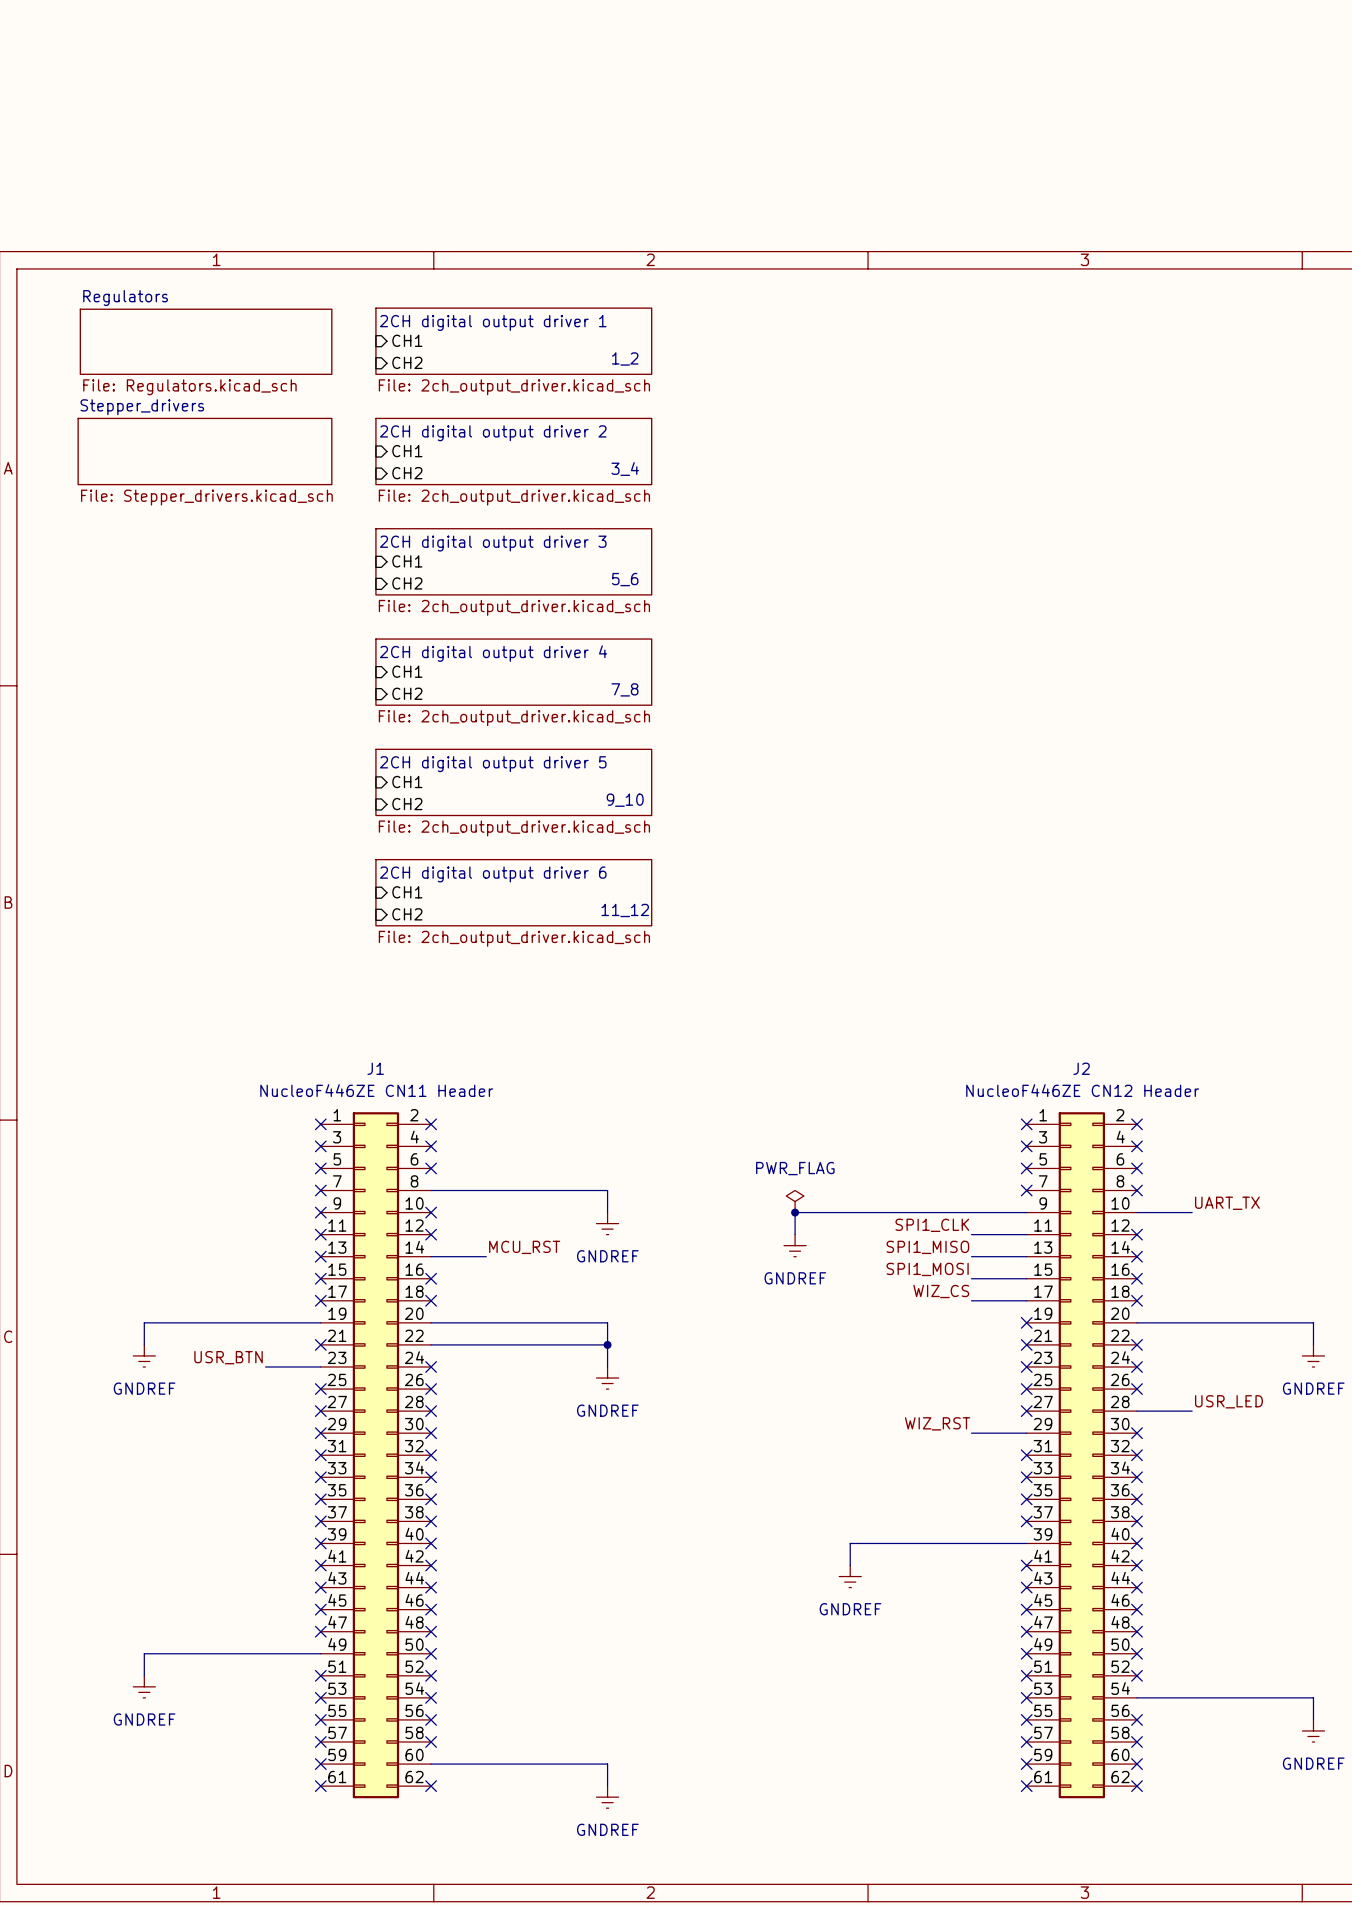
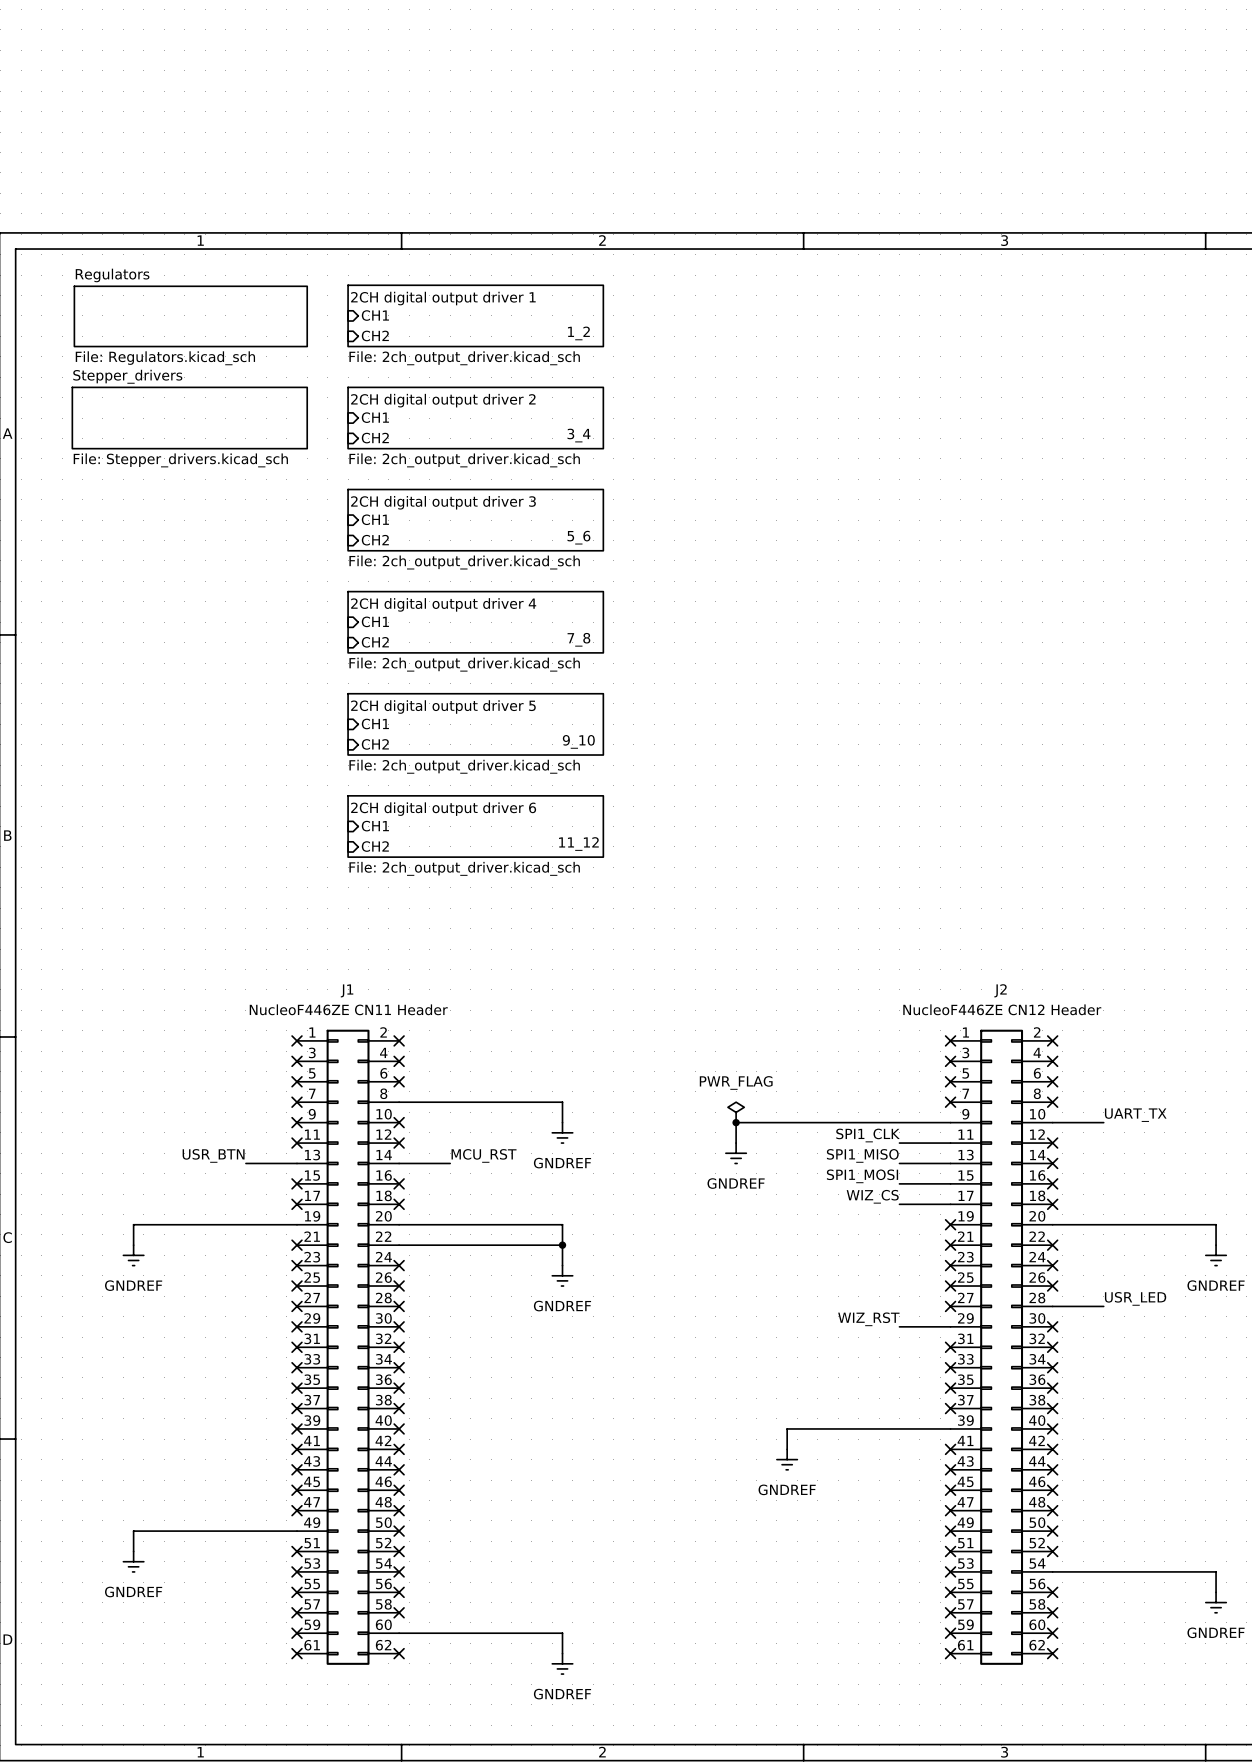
no-connect mark: (320, 1256) -> none
label position: USR_BTN (228, 1357) -> USR_BTN (213, 1155)
wire: (265, 1366) (320, 1366) -> (245, 1163) (297, 1163)
no-connect mark: none -> (297, 1265)

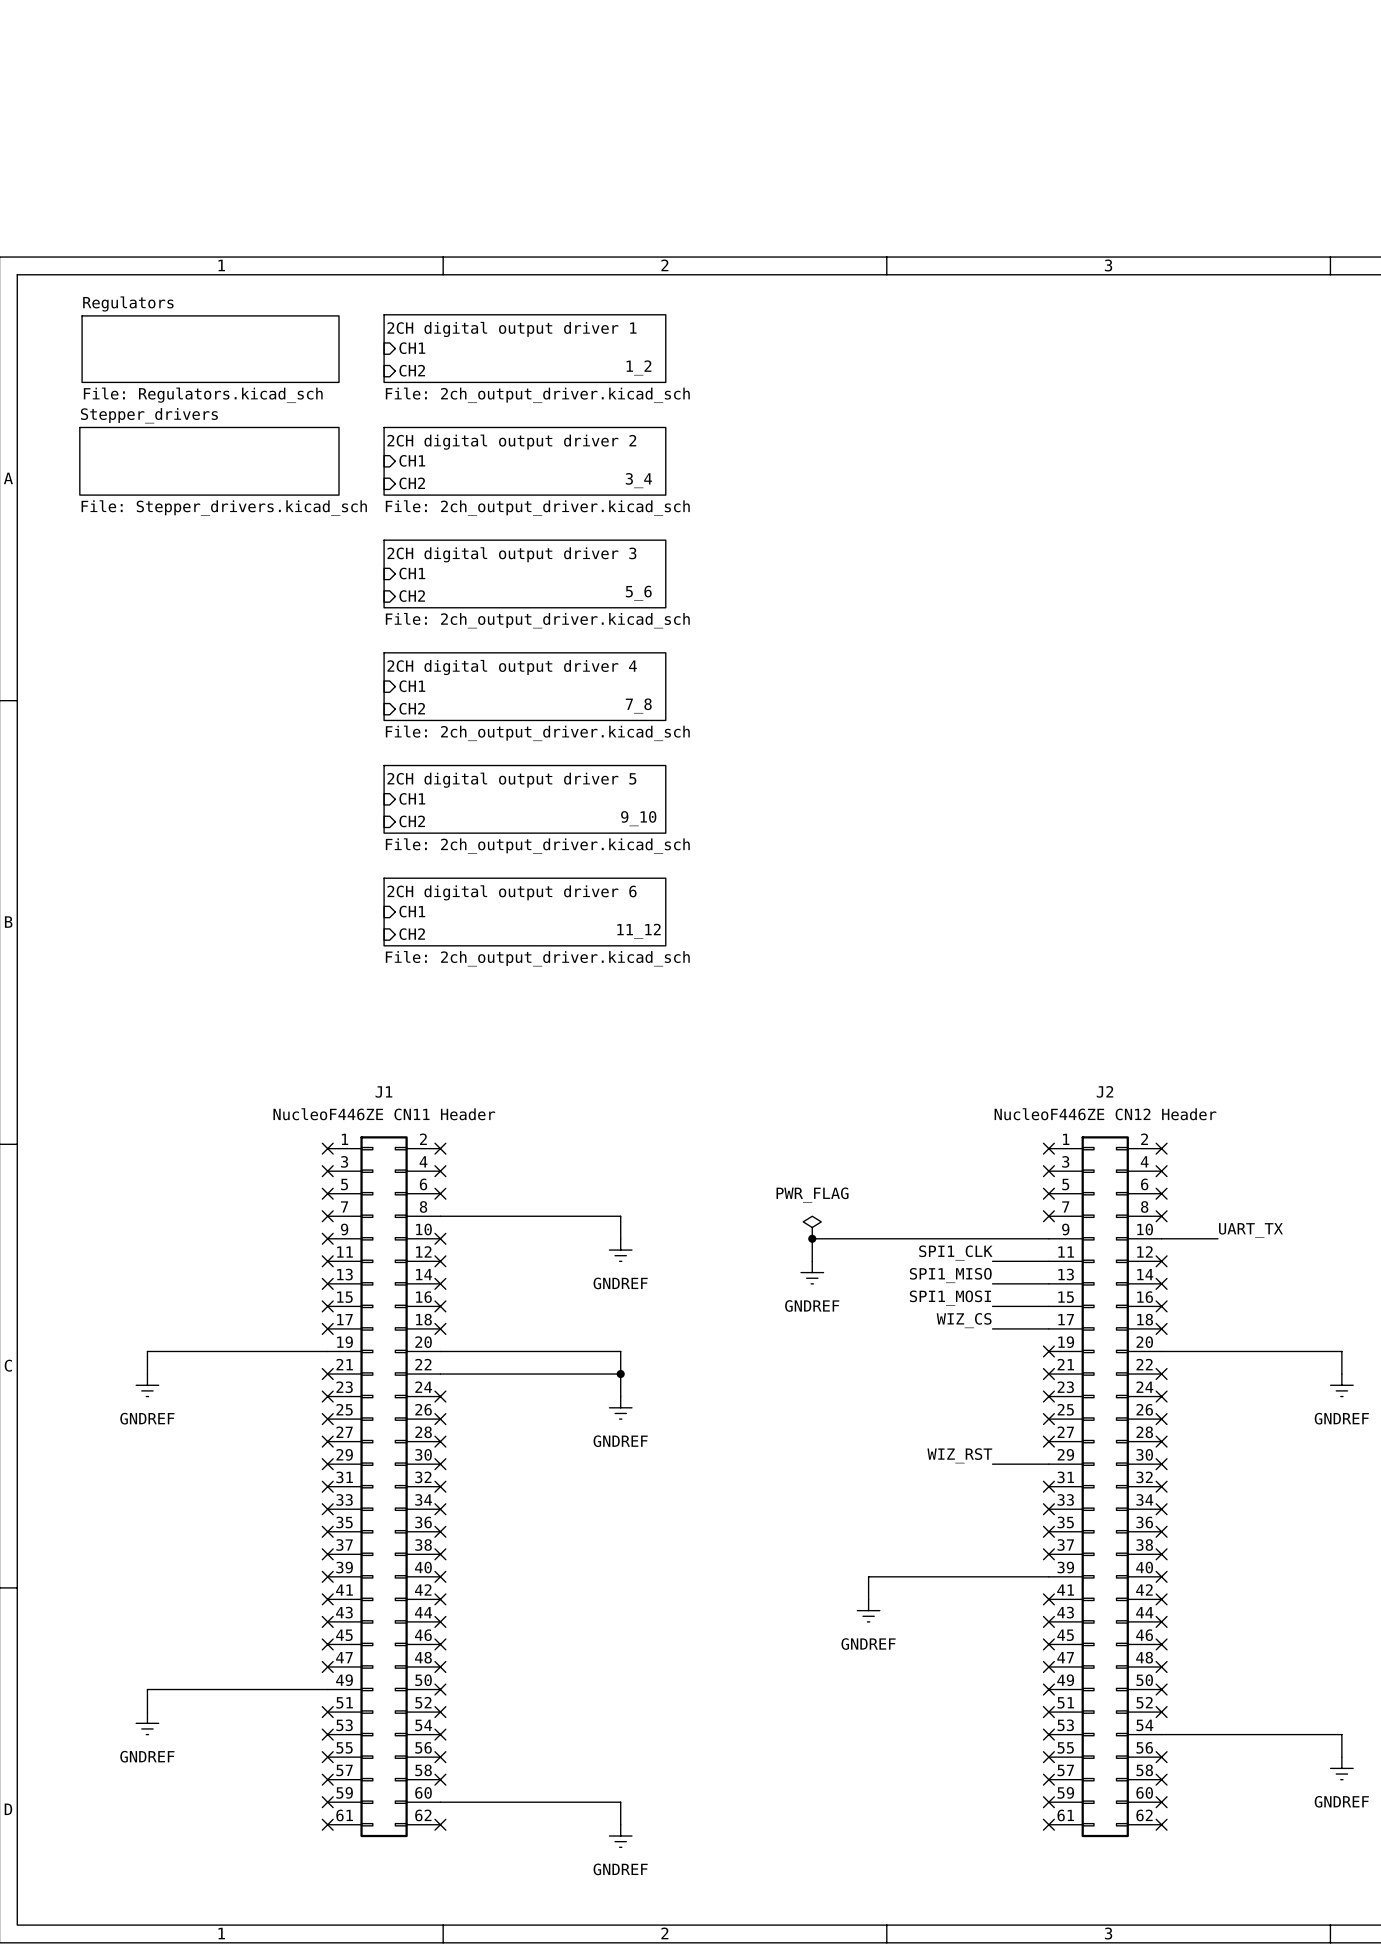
label: USR_BTN (213, 1155) -> none
label: MCU_RST (484, 1155) -> none
wire: (245, 1163) (297, 1163) -> none
no-connect mark: none -> (327, 1283)
wire: (399, 1163) (450, 1163) -> none
no-connect mark: none -> (440, 1283)
label: USR_LED (1135, 1298) -> none
wire: (1052, 1306) (1103, 1306) -> none
no-connect mark: none -> (1161, 1441)

